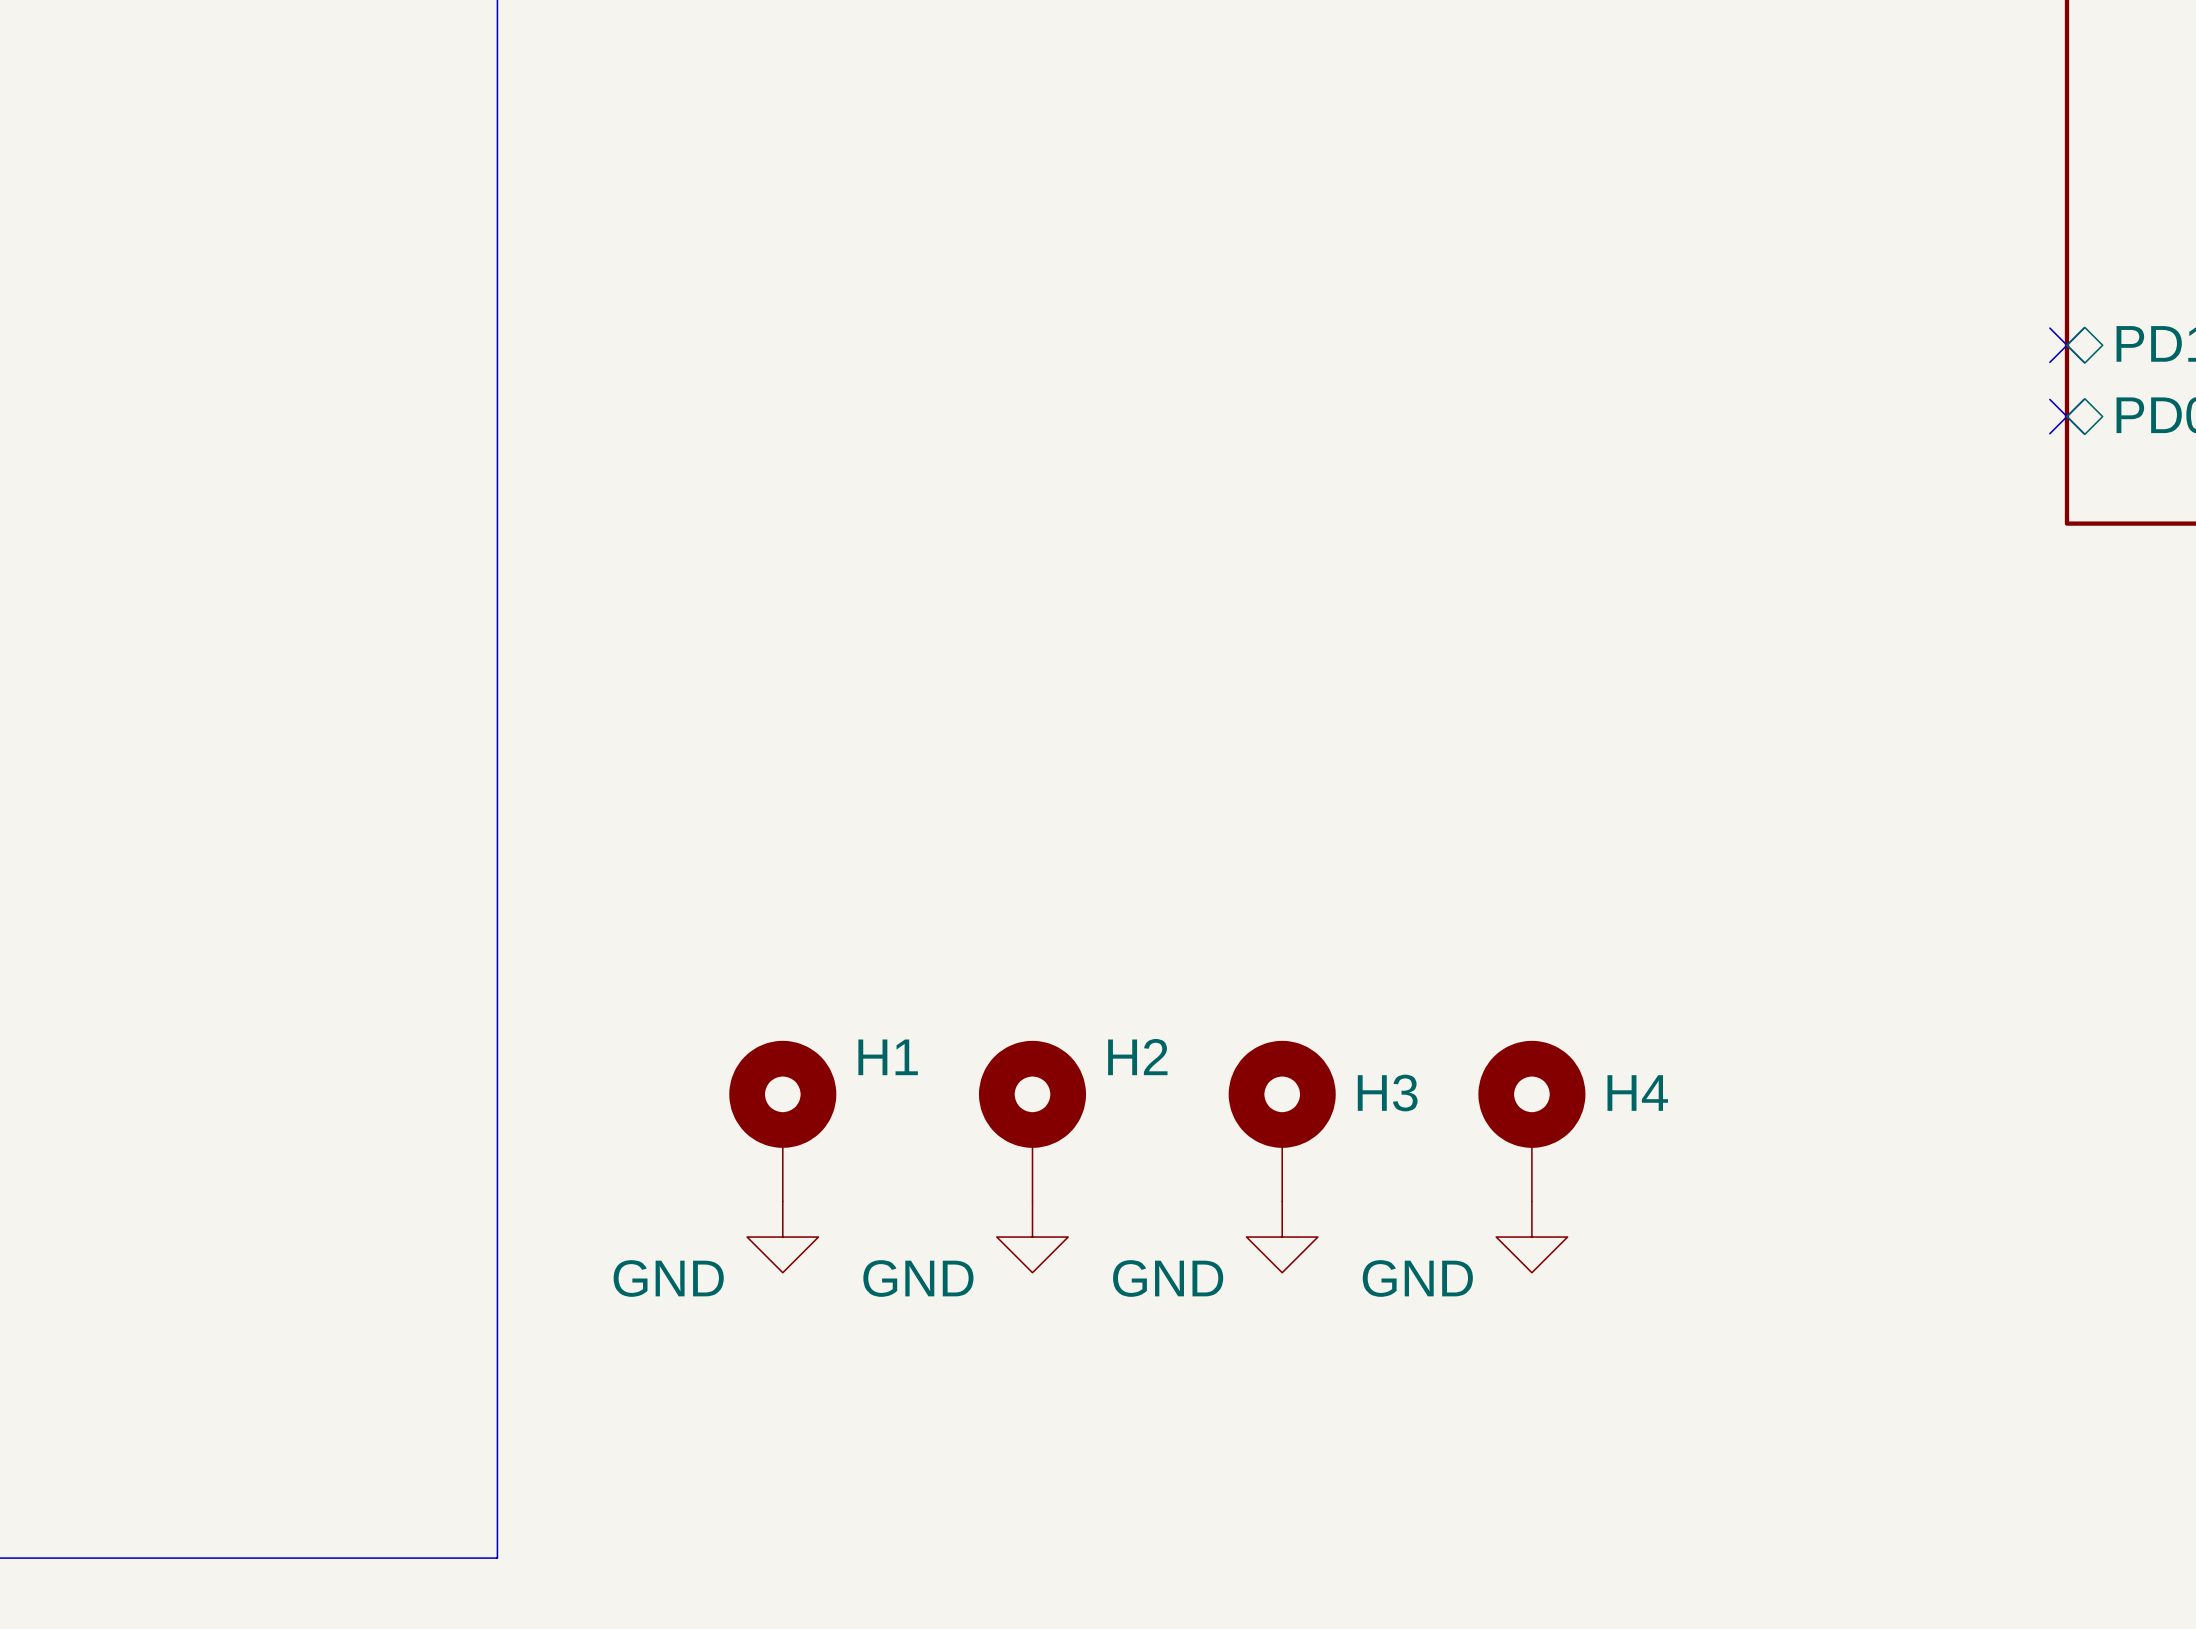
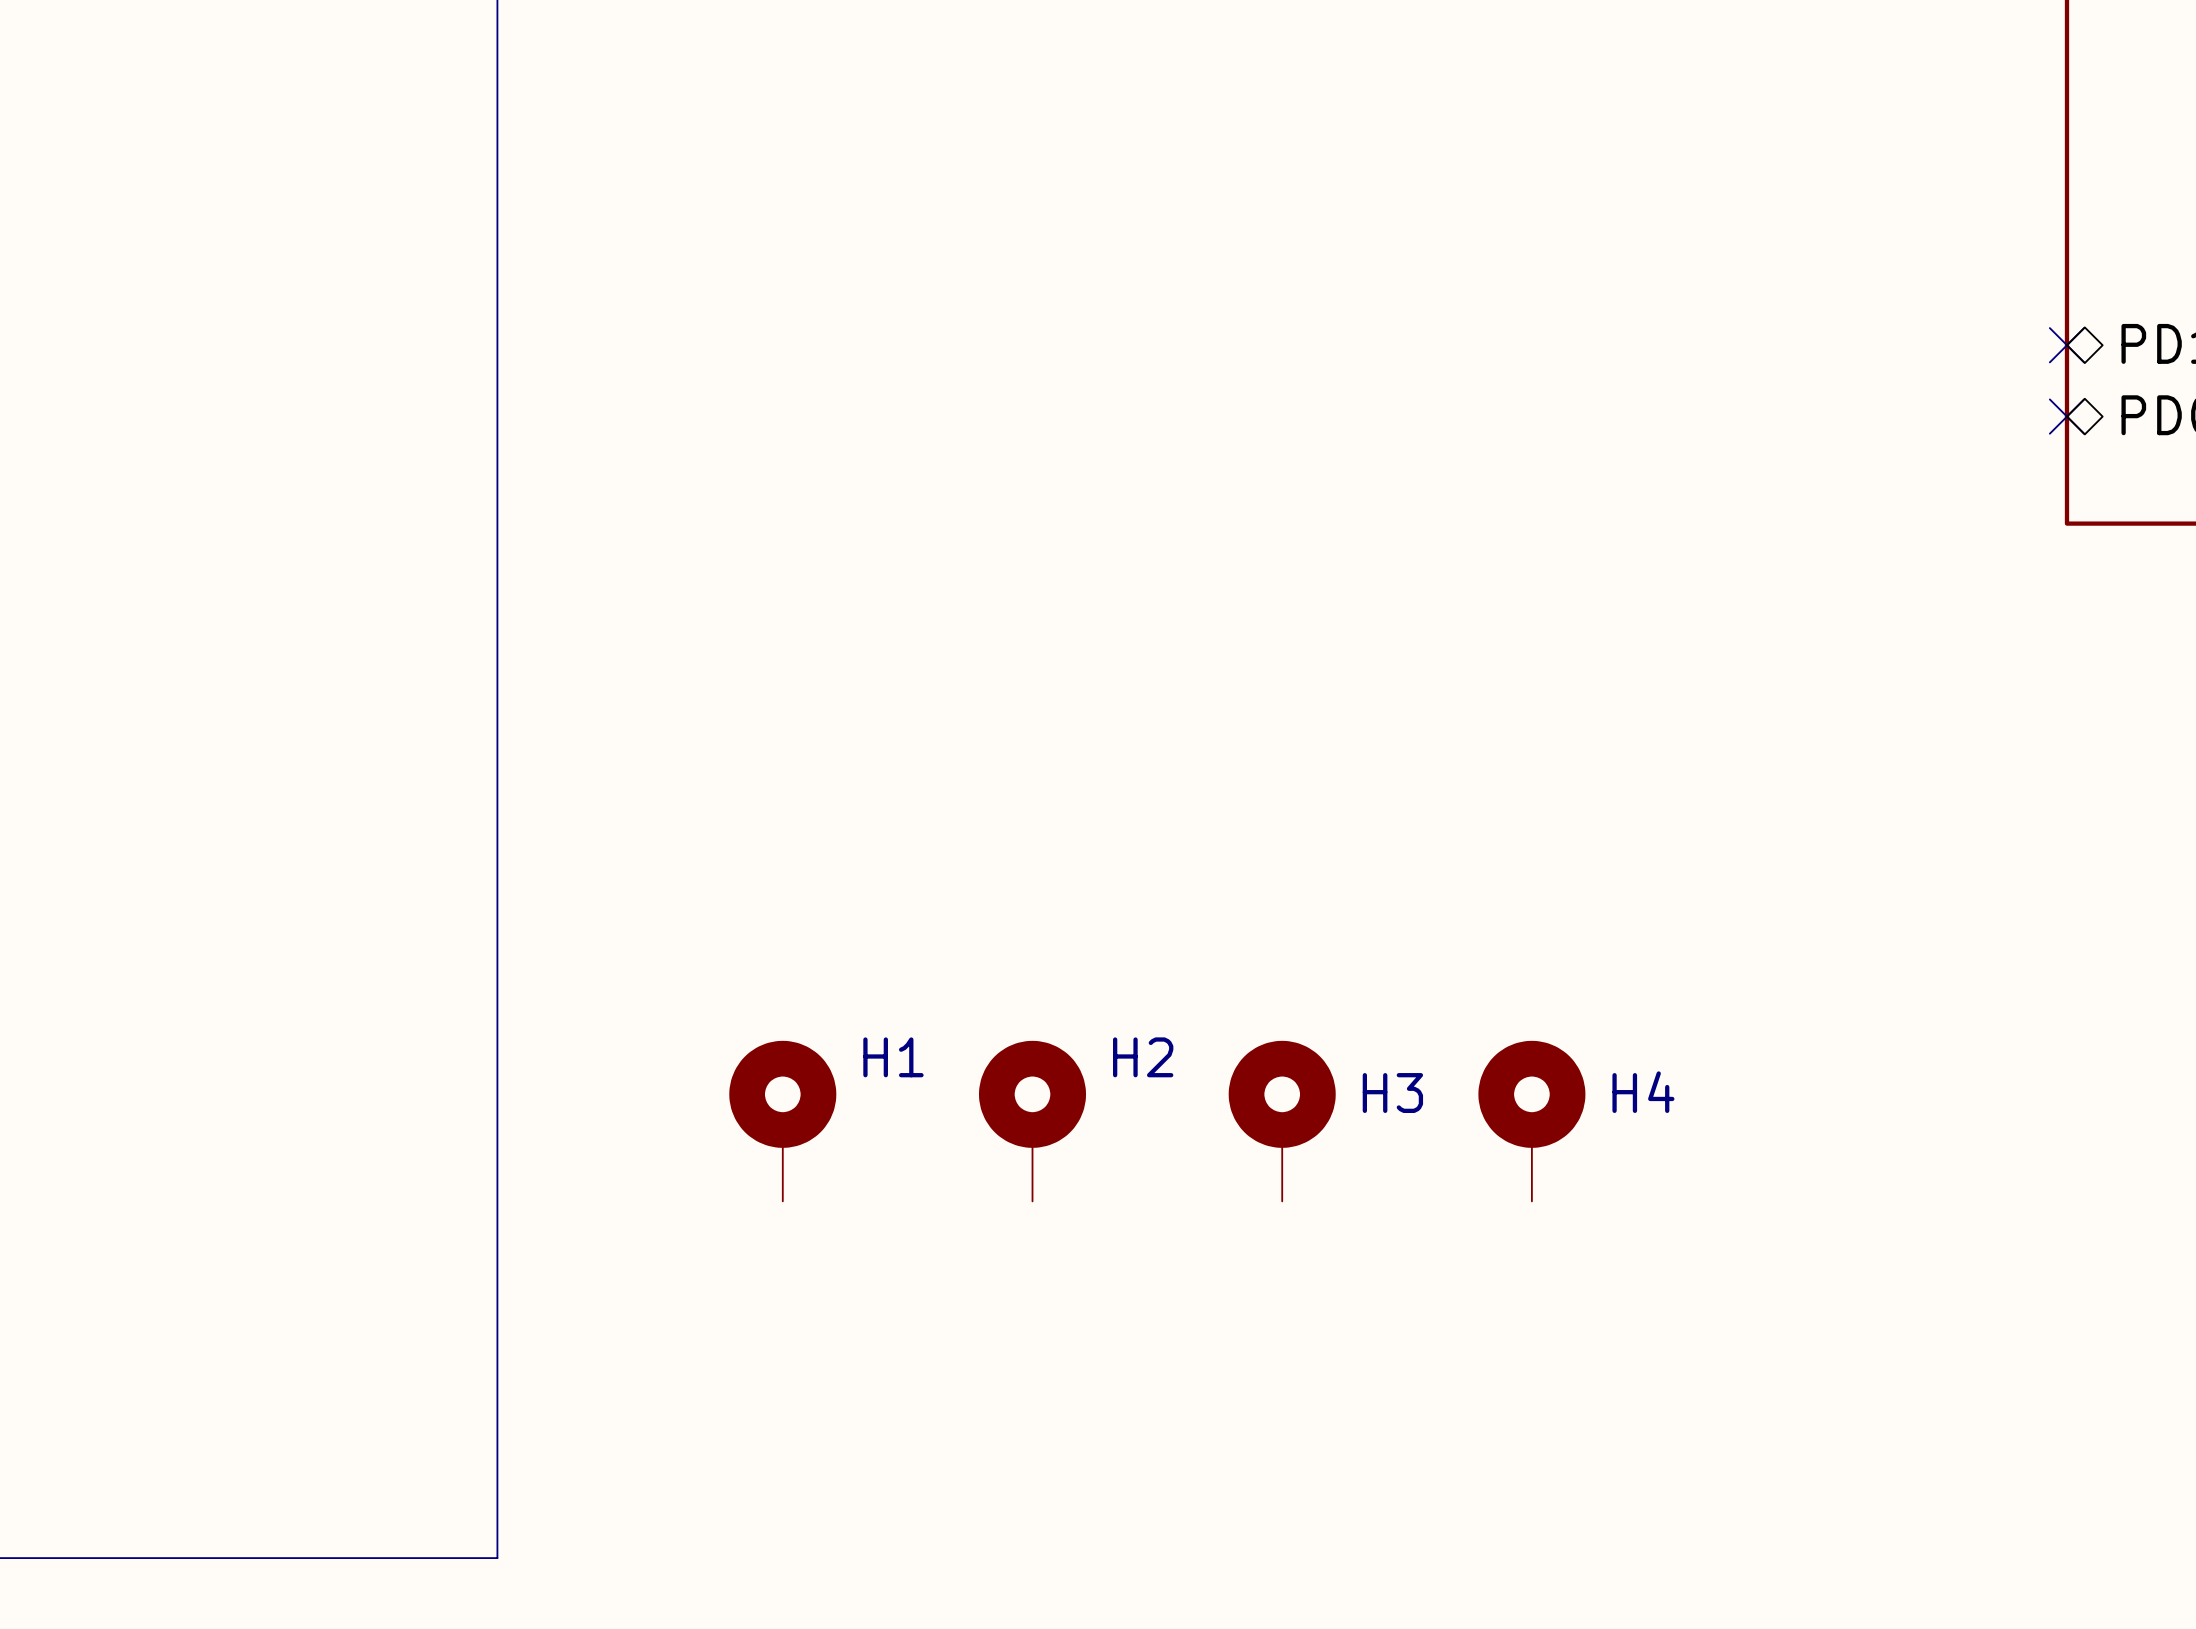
power symbol: GND (782, 1237) -> none
power symbol: GND (1032, 1237) -> none
power symbol: GND (1282, 1237) -> none
power symbol: GND (1531, 1237) -> none

